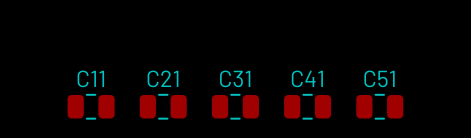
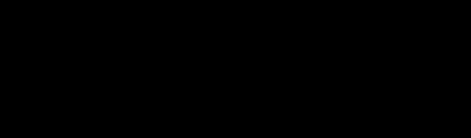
C11: (91, 106) -> none
C21: (163, 106) -> none
C31: (235, 106) -> none
C41: (307, 106) -> none
C51: (379, 106) -> none

